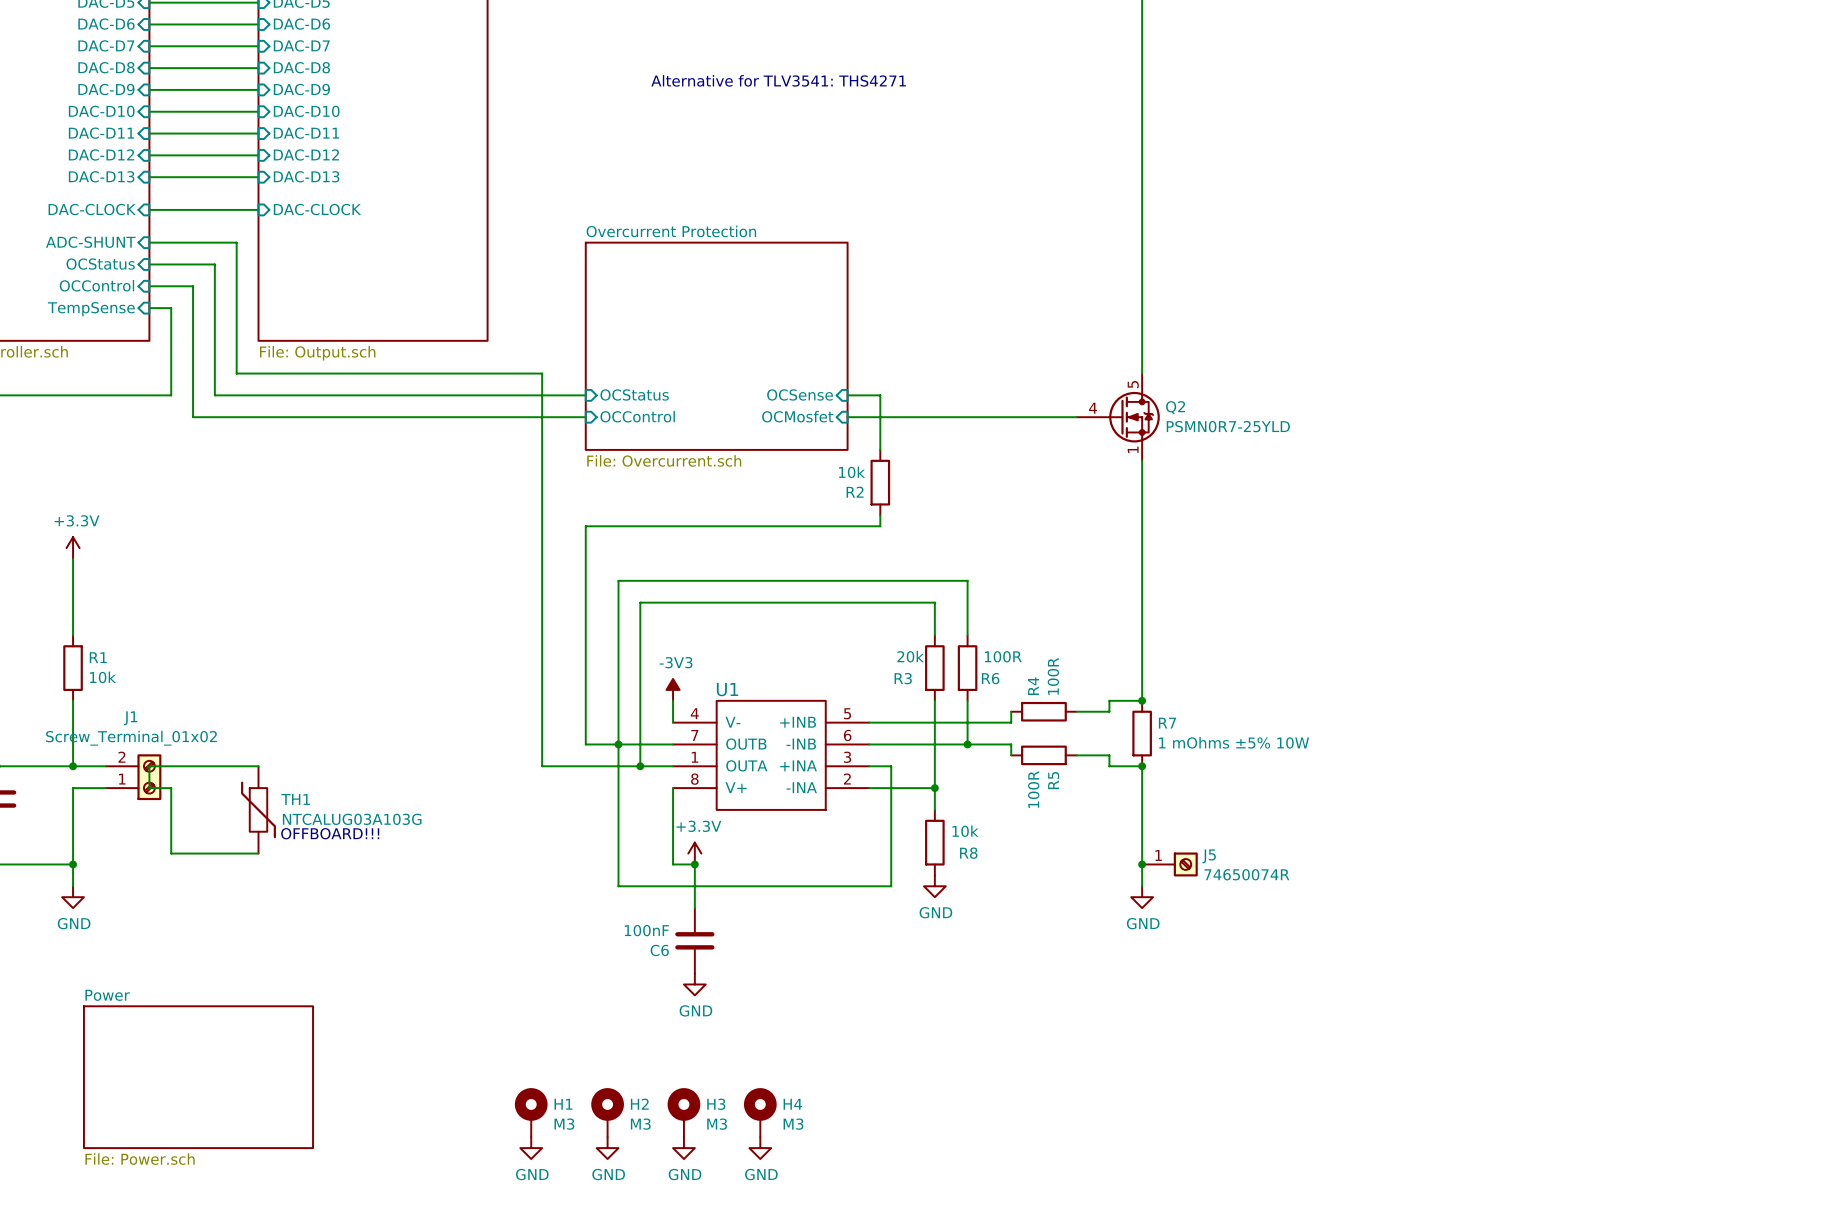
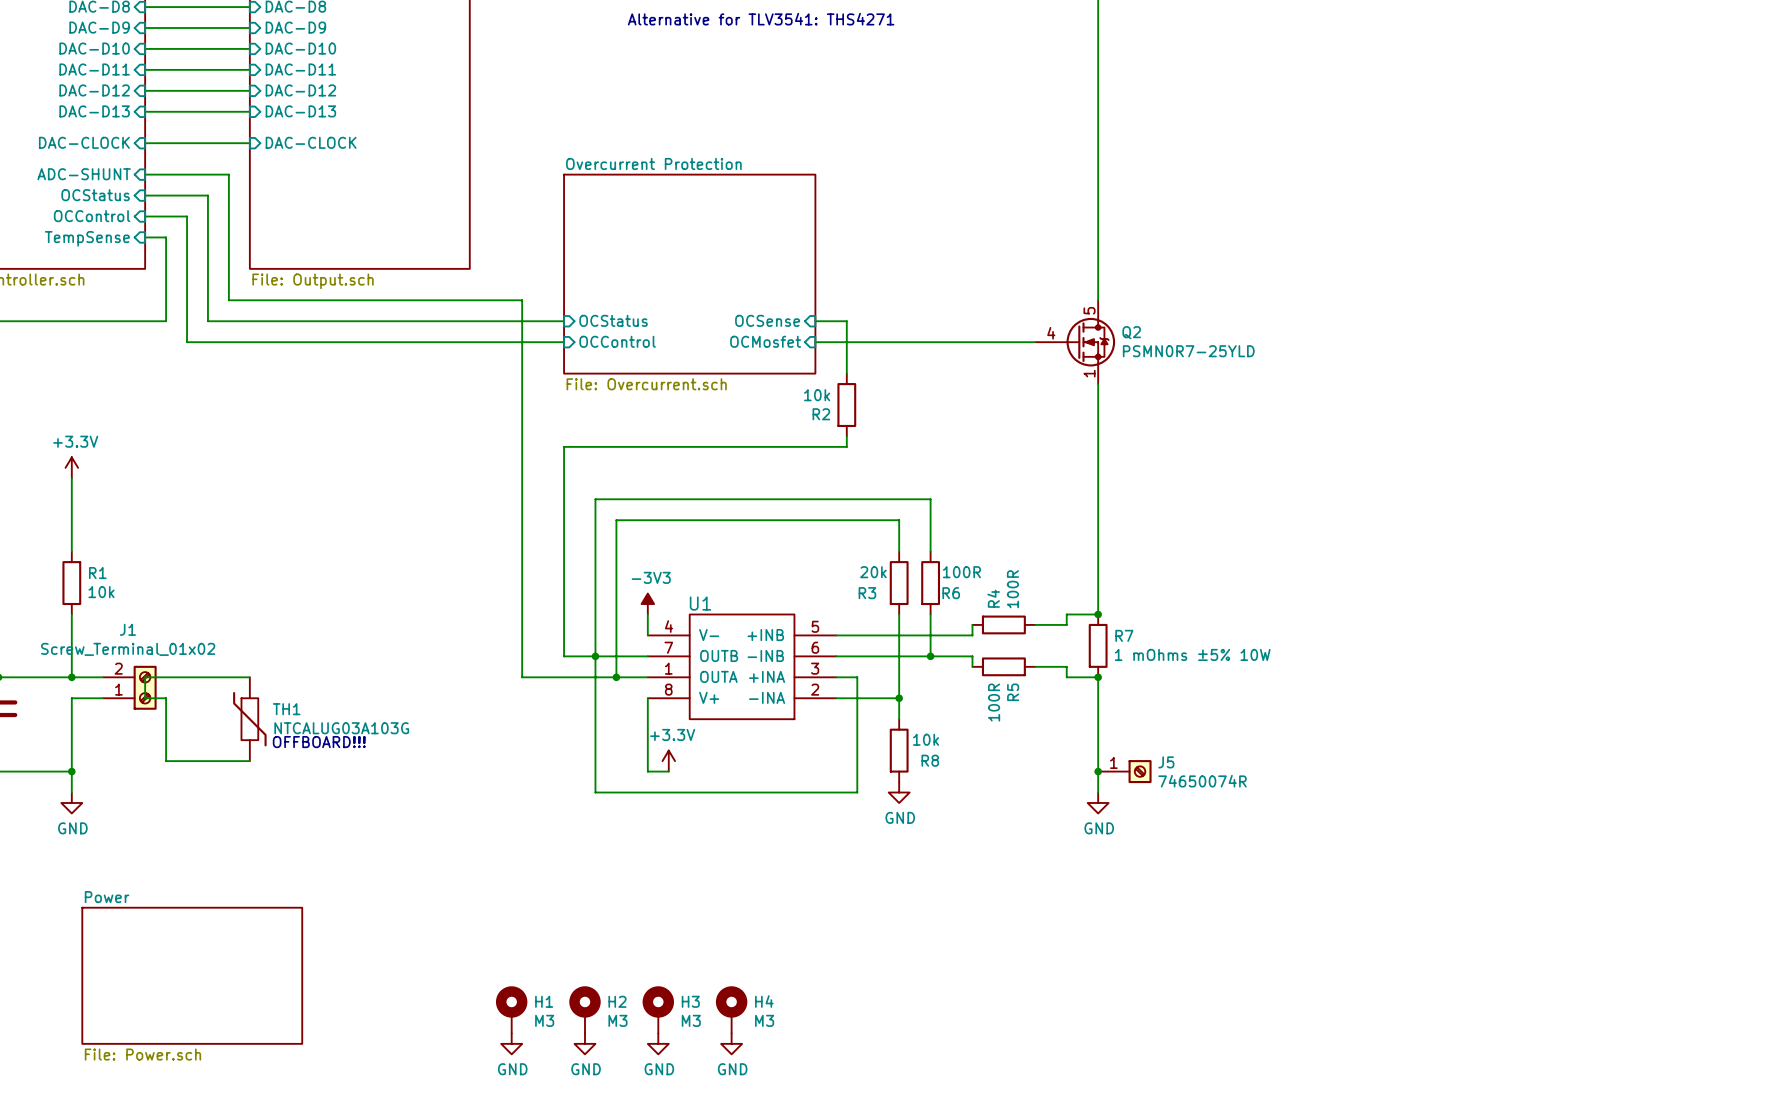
wire: (694, 864) (694, 908) -> none
junction: (694, 864) -> none
C6: 100nF (694, 940) -> none
power symbol: GND (694, 984) -> none

